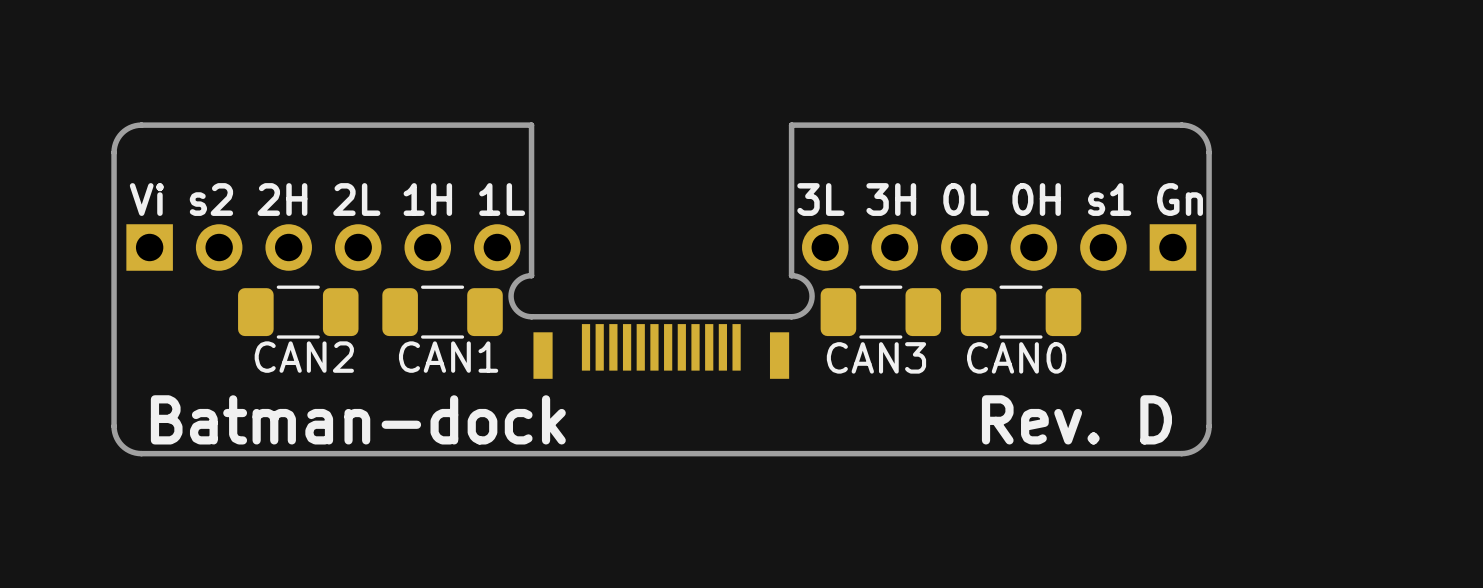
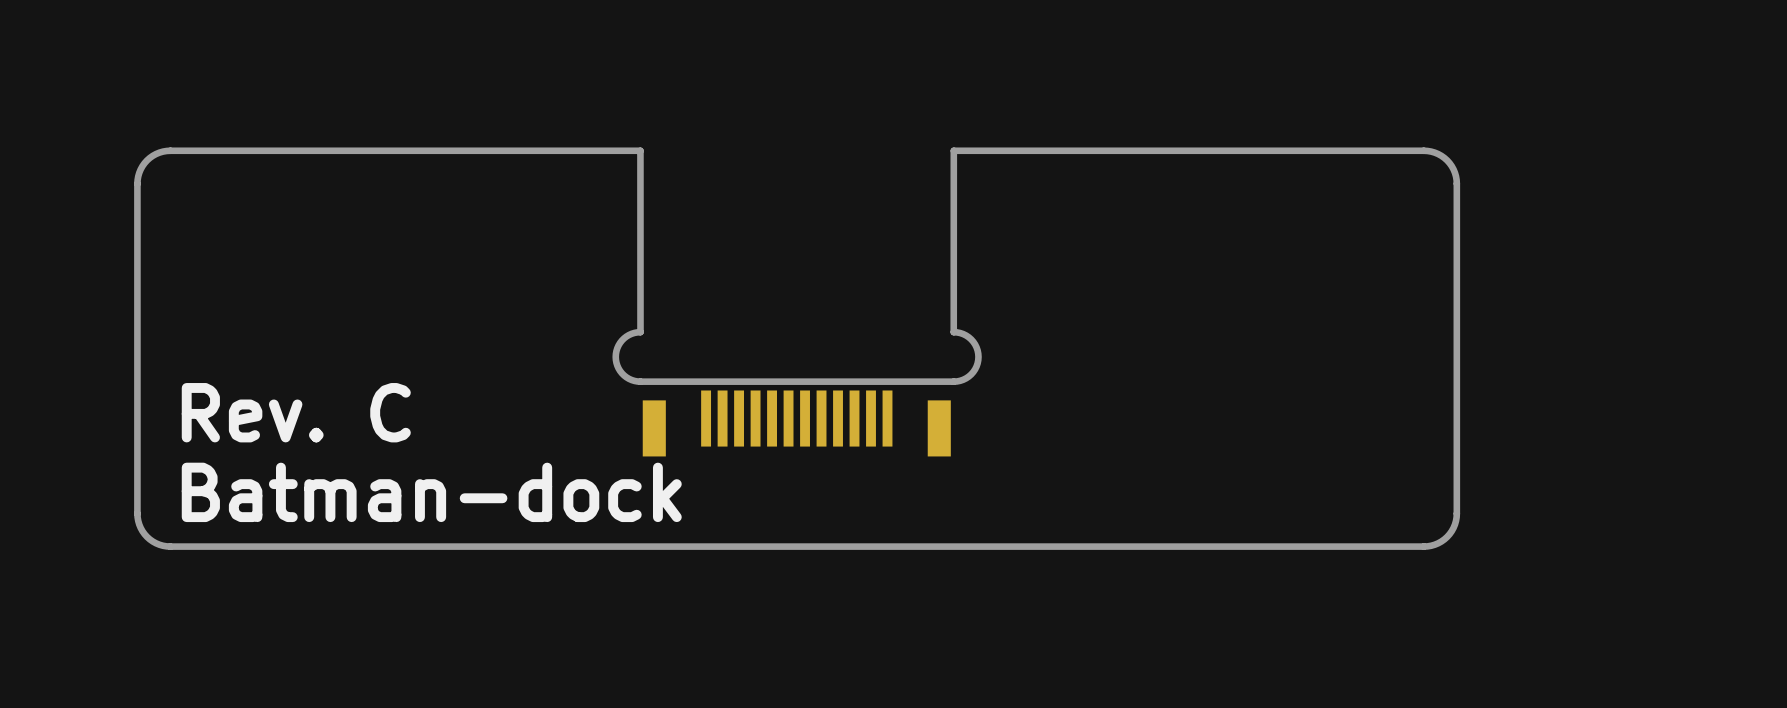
text: Vi s2 2H 2L 1H 1L 3L 3H 0L 0H s1 Gn (666, 199) -> none
part: (323, 247) -> none
part: (999, 247) -> none
CAN2: (298, 312) -> none
CAN1: (442, 312) -> none
CAN3: (880, 312) -> none
CAN0: (1021, 312) -> none
text: none -> Rev. C (296, 412)
text: Batman-dock Rev. D (661, 419) -> Batman-dock (431, 492)

